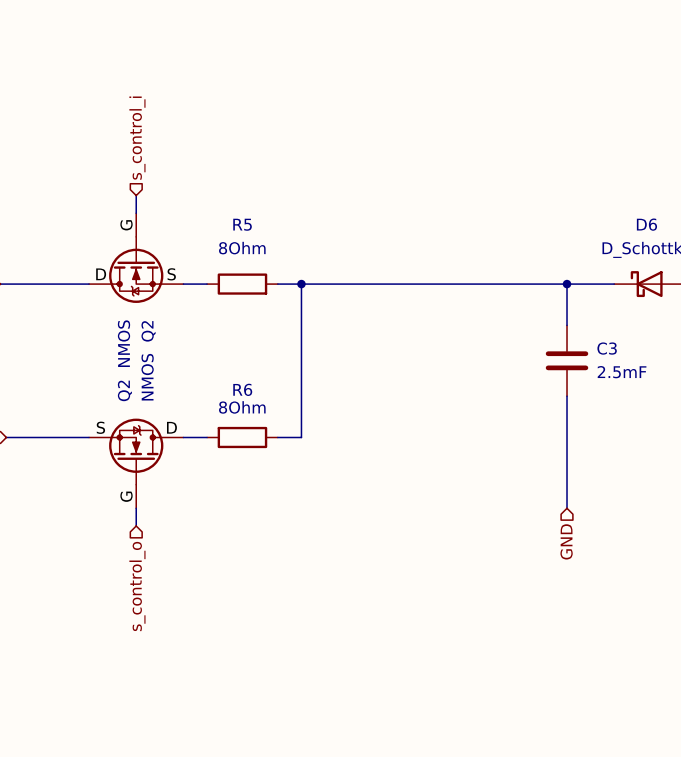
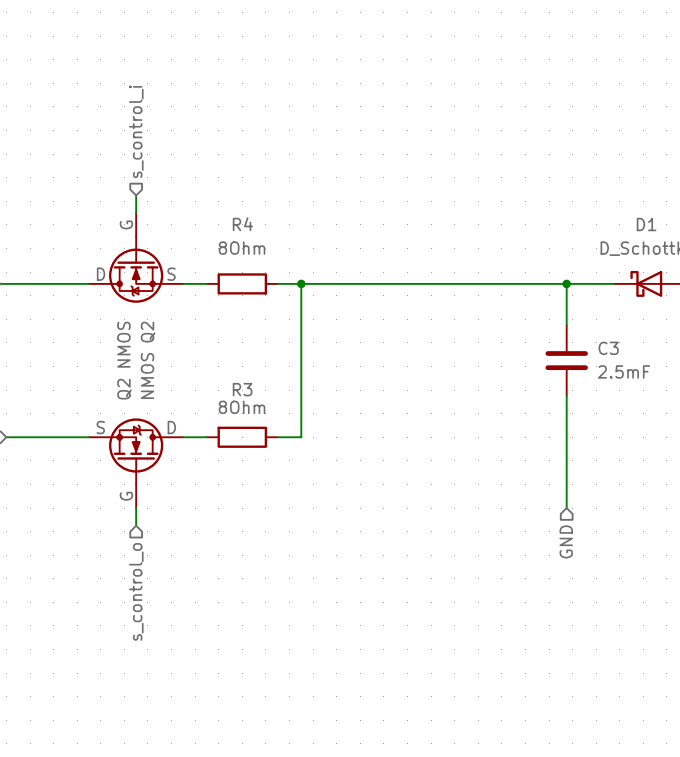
R5 name: R5 (242, 224) -> R4 (242, 224)
D6 name: D6 (646, 224) -> D1 (646, 224)
R6 name: R6 (242, 389) -> R3 (242, 389)

